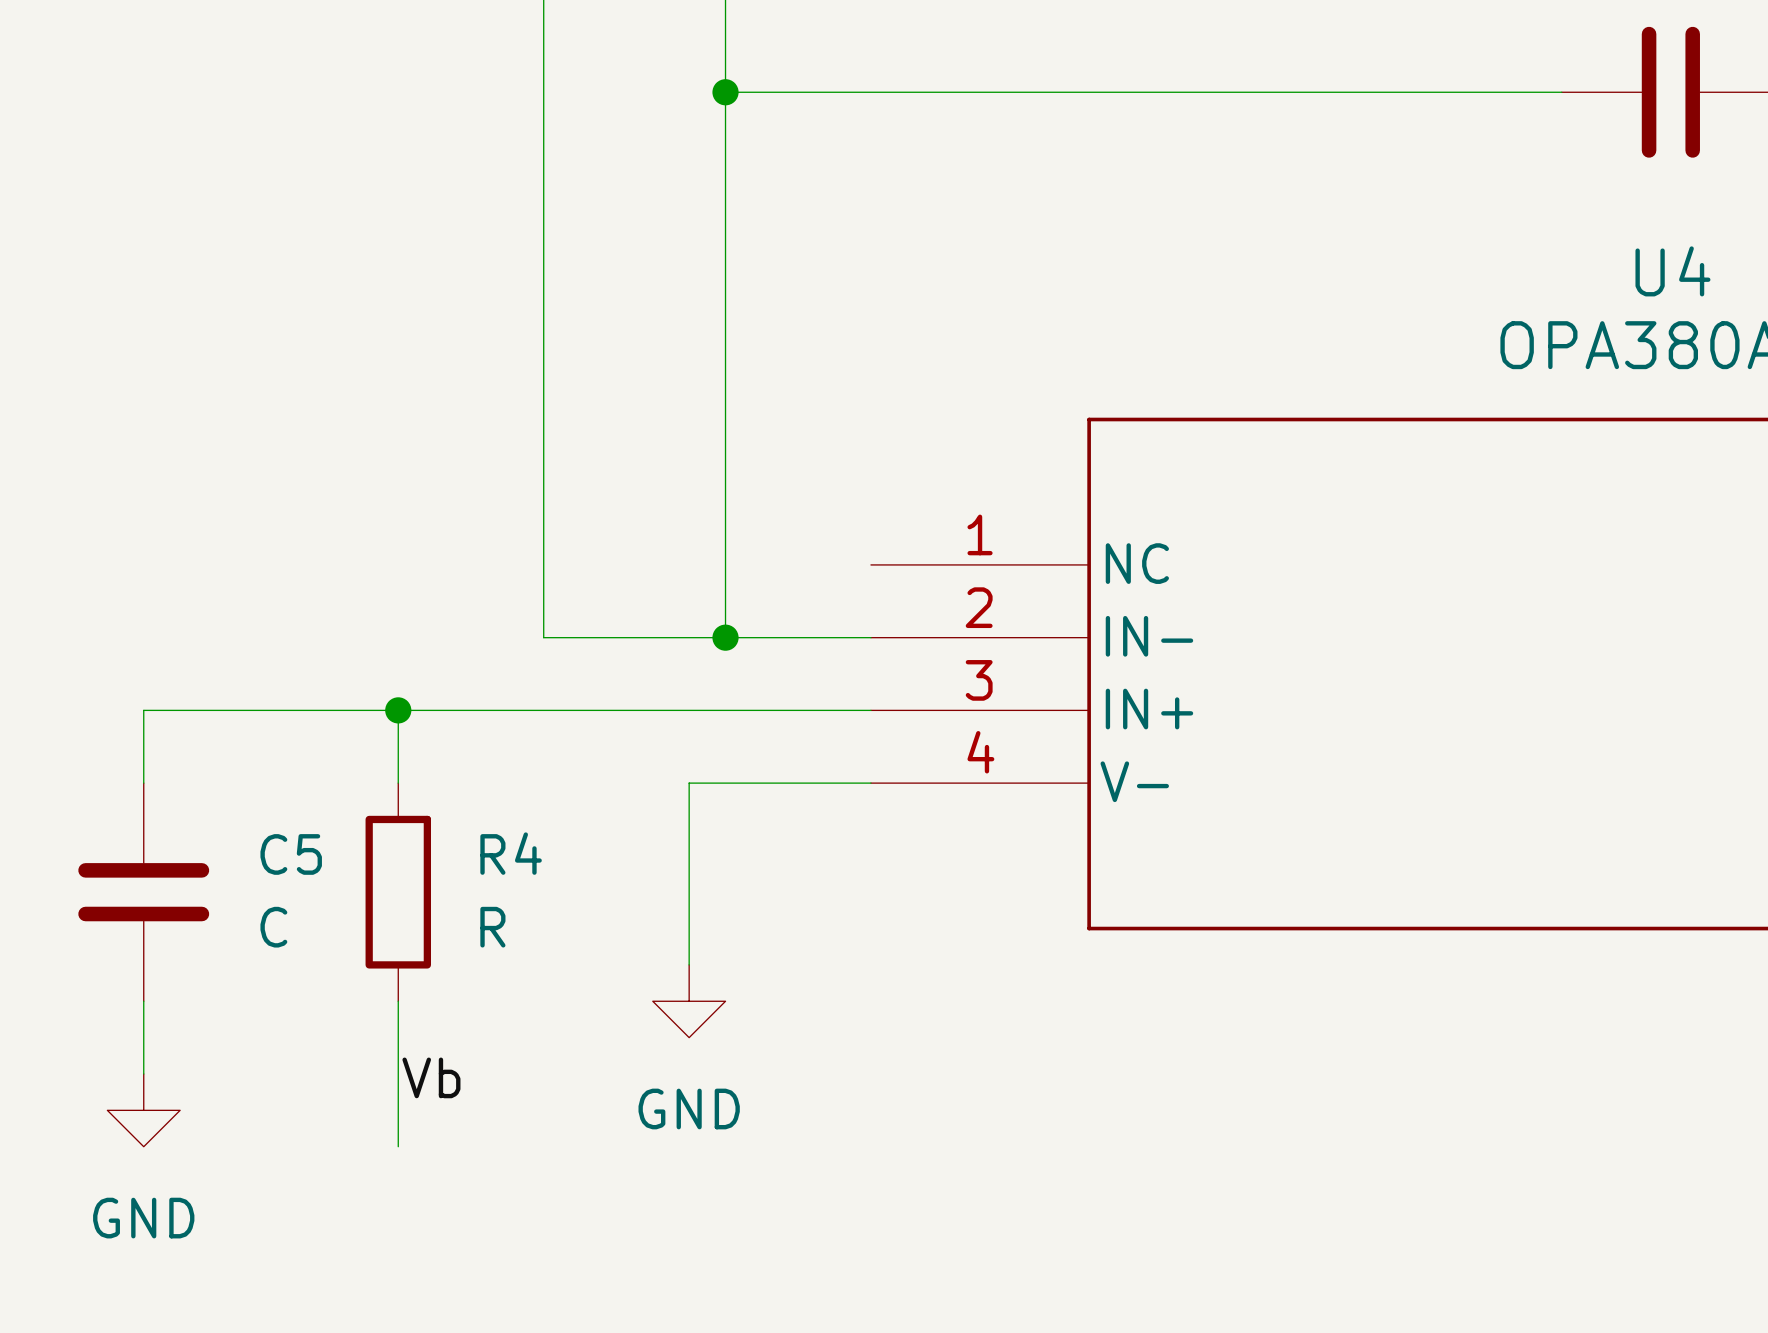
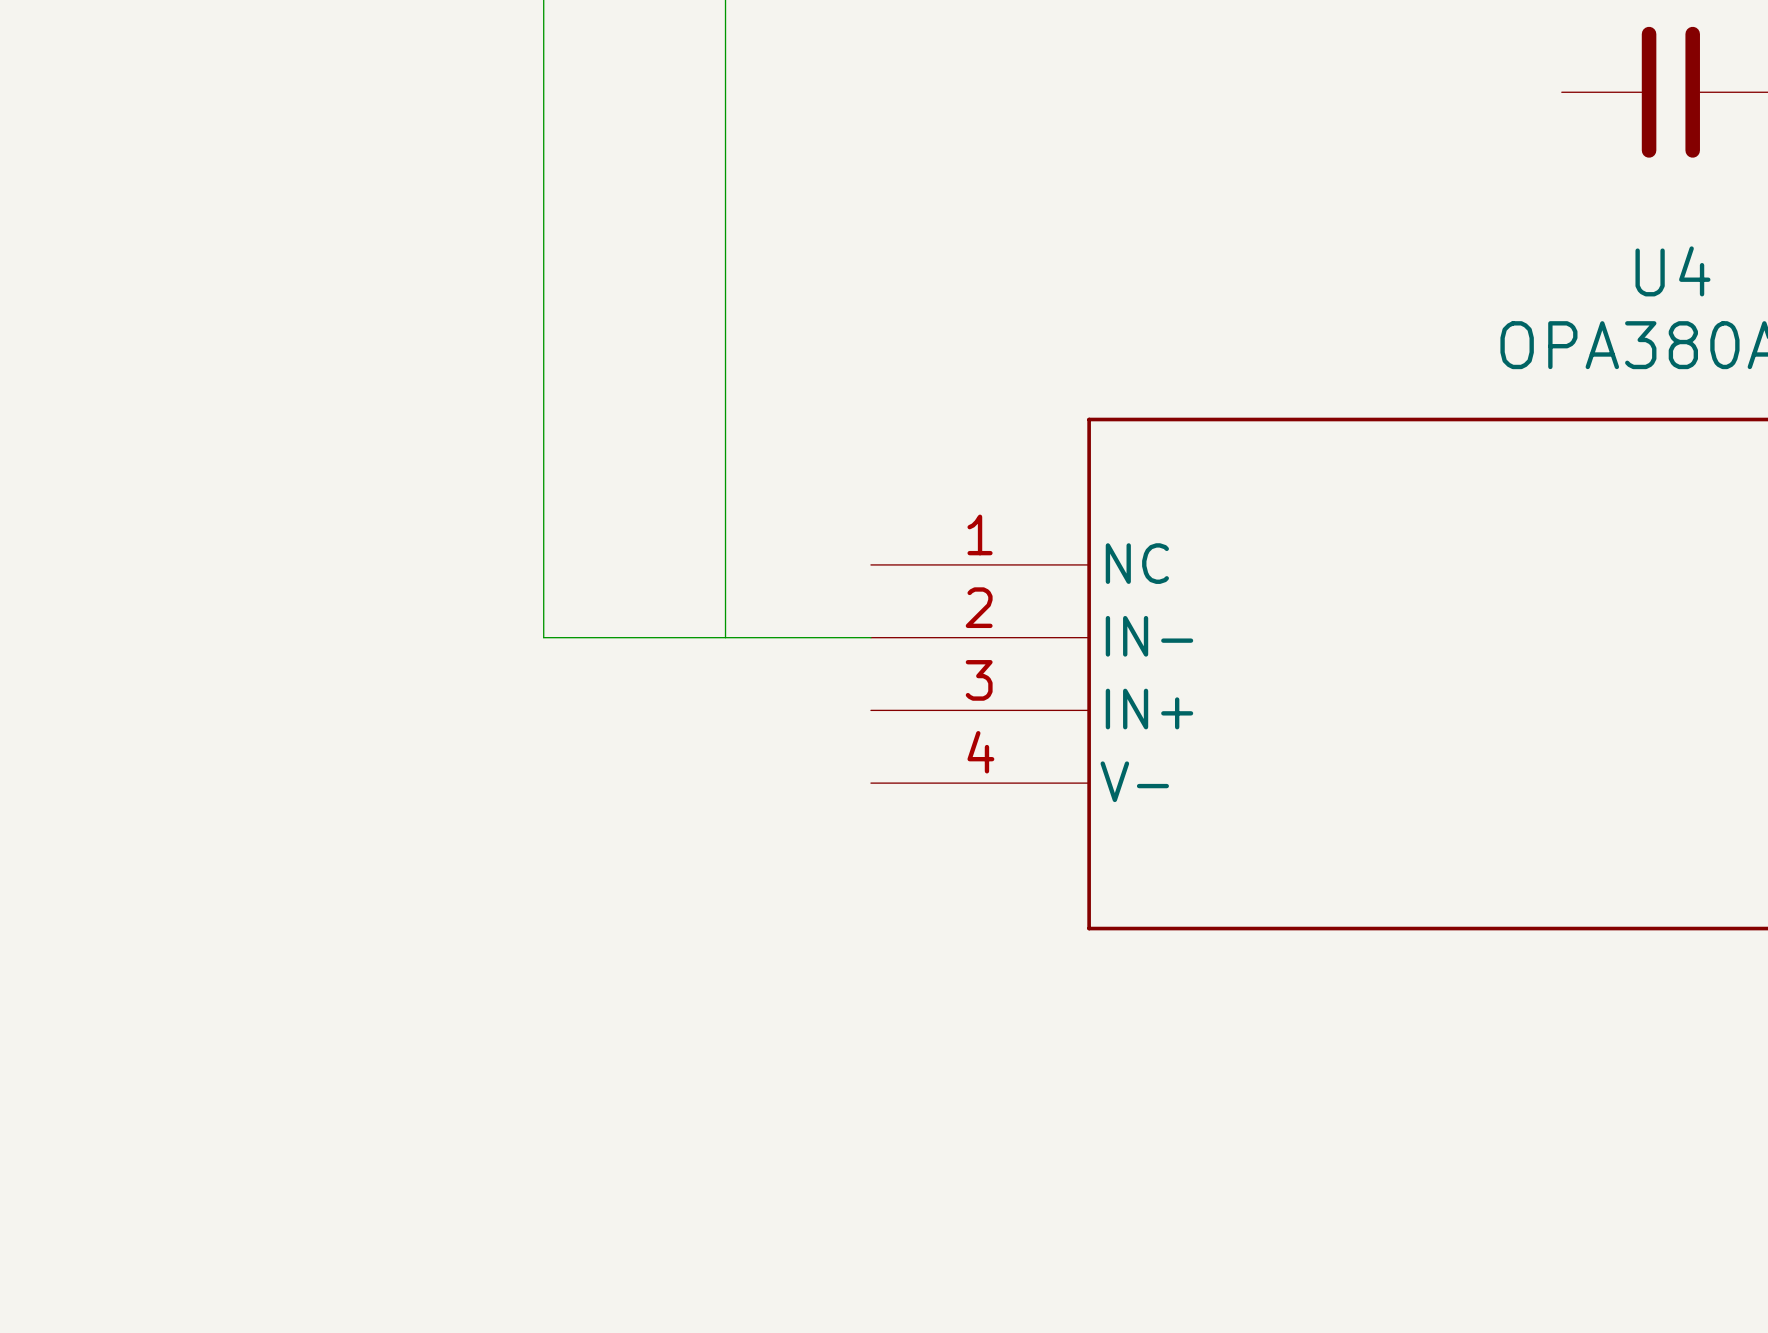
wire: (725, 92) (1561, 92) -> none
junction: (725, 92) -> none
junction: (725, 637) -> none
wire: (398, 710) (398, 783) -> none
junction: (398, 710) -> none
wire: (870, 710) (143, 710) (143, 783) -> none
wire: (870, 783) (689, 783) (689, 964) -> none
C5: C (143, 892) -> none
R4: R (398, 892) -> none
wire: (143, 1001) (143, 1073) -> none
wire: (398, 1001) (398, 1146) -> none
power symbol: GND (689, 1001) -> none
label: Vb (431, 1077) -> none
power symbol: GND (143, 1110) -> none

